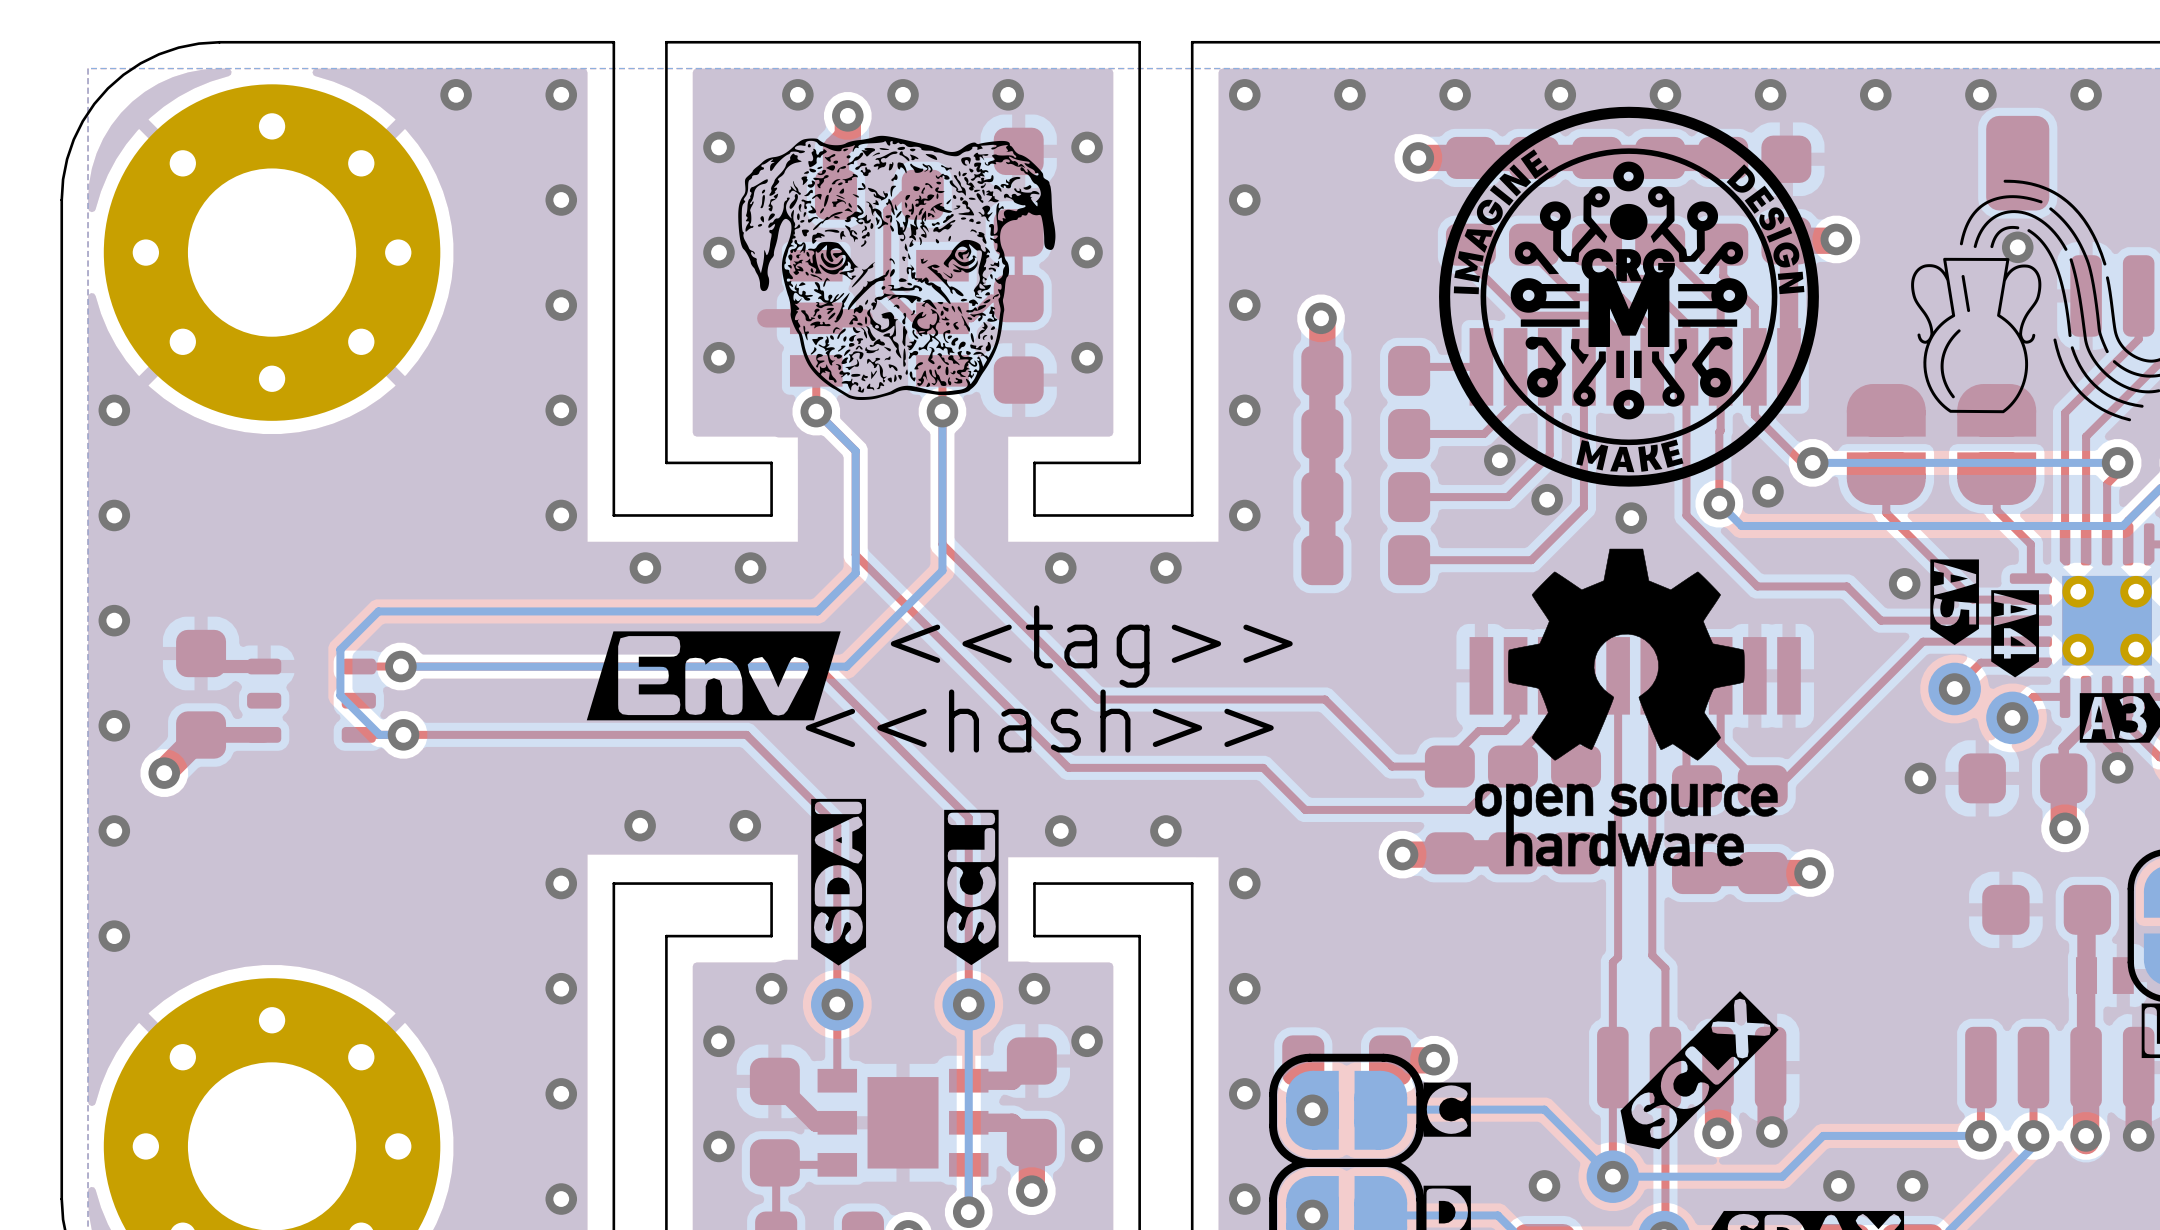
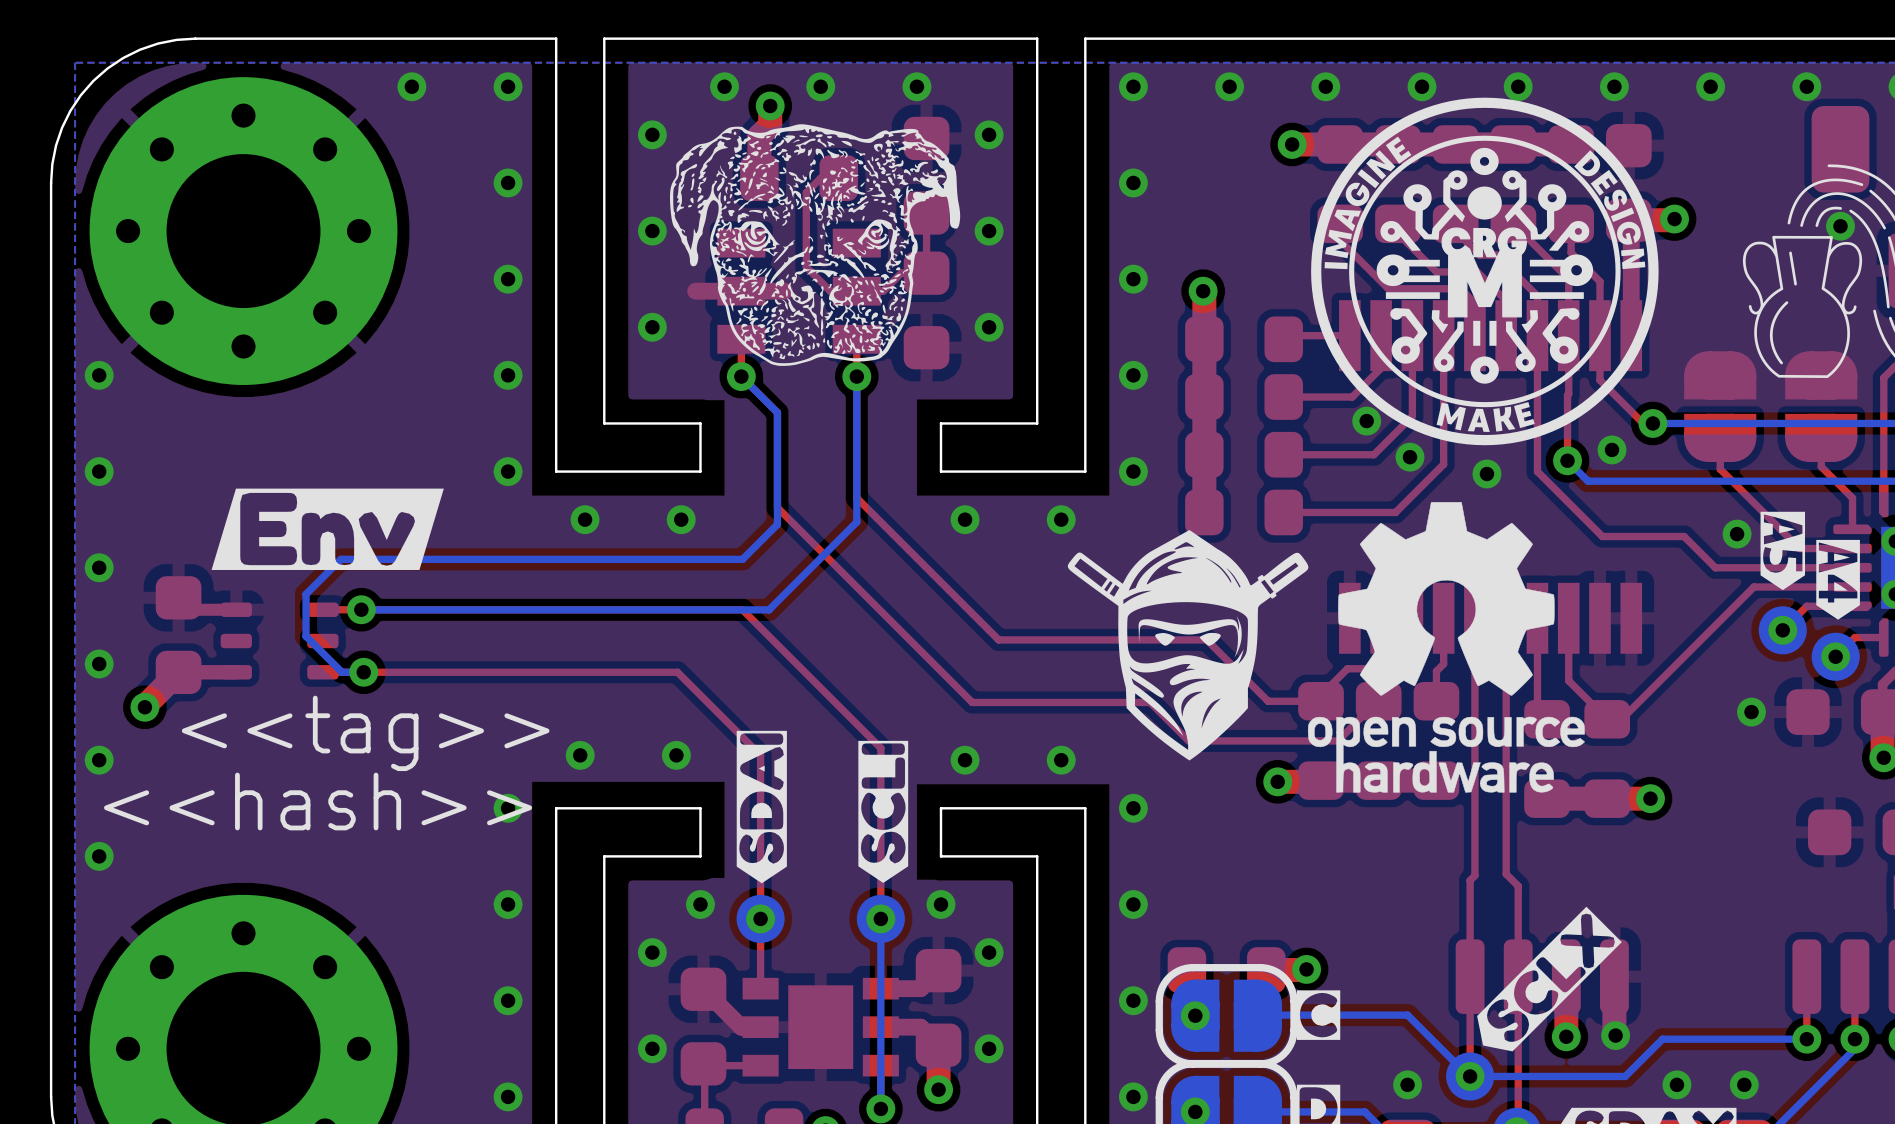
drawing: none -> [1067, 530, 1309, 761]
text position: <<tag>> (1091, 646) -> <<tag>> (365, 733)
drawing position: (713, 675) -> (327, 529)
drawing position: (1626, 707) -> (1446, 647)
text position: <<hash>> (1039, 721) -> <<hash>> (318, 801)

